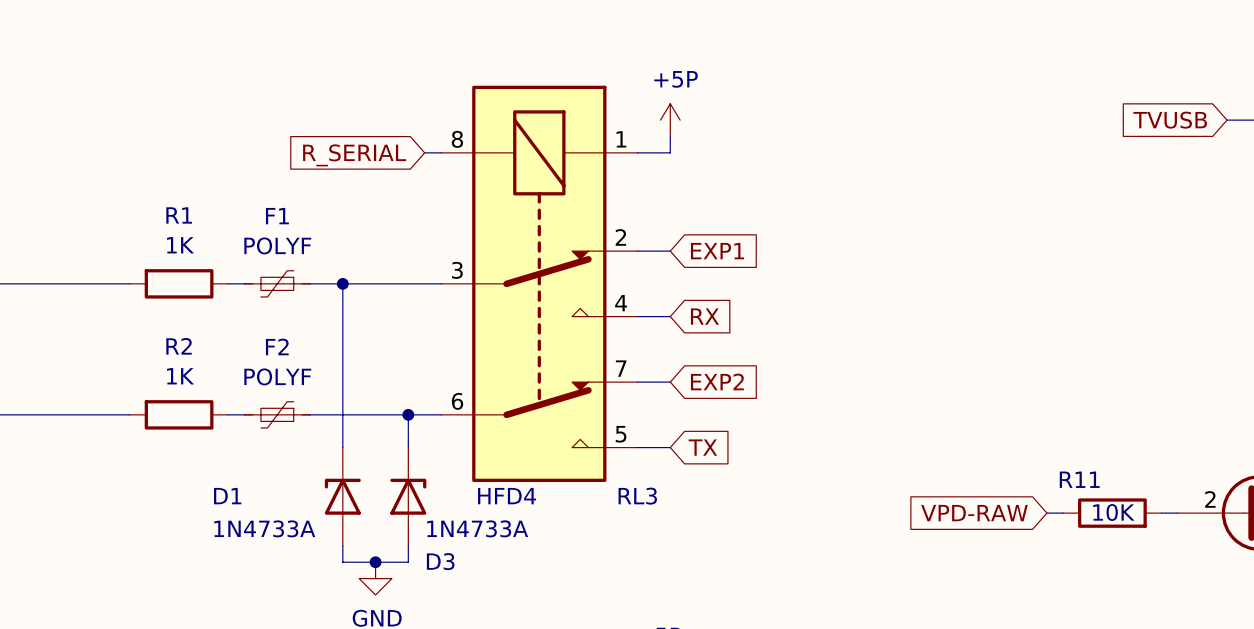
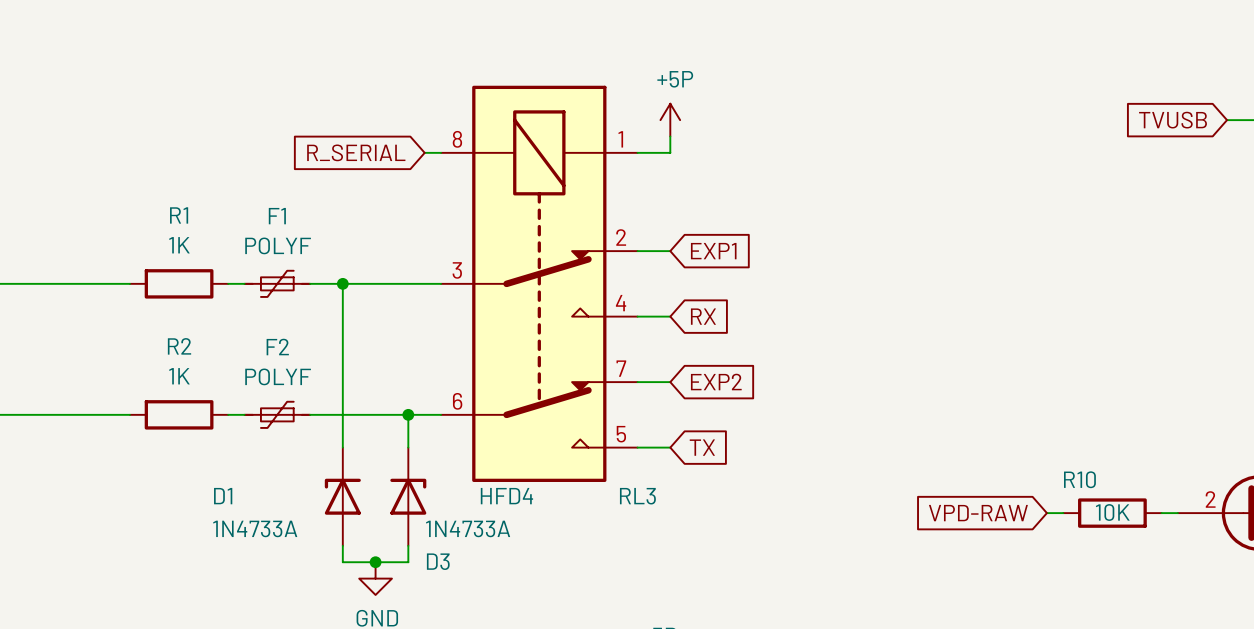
R11 name: R11 (1079, 479) -> R10 (1079, 479)

